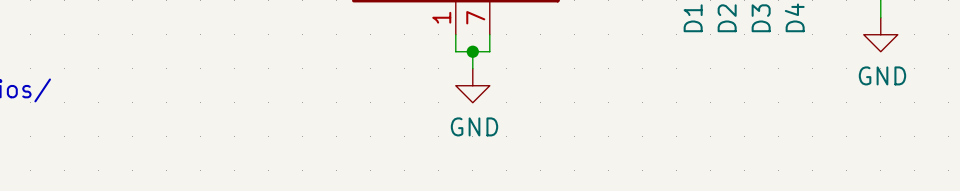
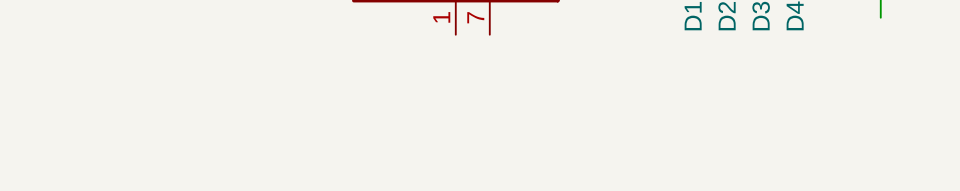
wire: (455, 34) (455, 51) (489, 51) (489, 34) -> none
power symbol: GND (880, 34) -> none
wire: (472, 51) (472, 68) -> none
junction: (472, 51) -> none
power symbol: GND (472, 85) -> none

